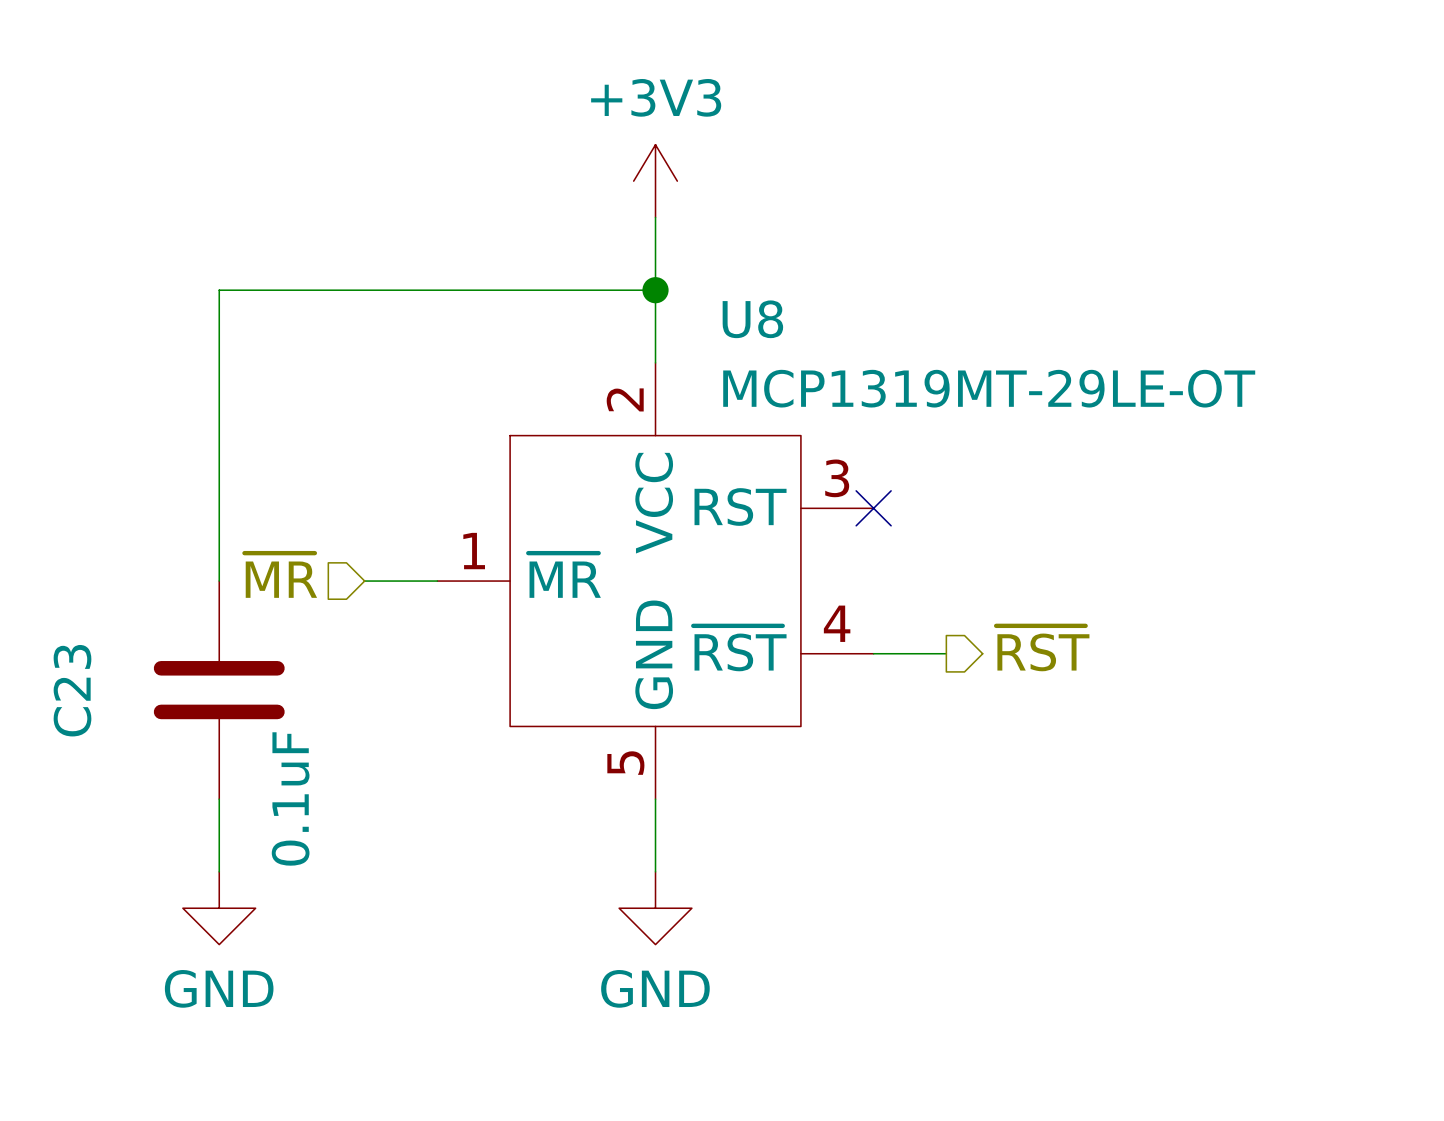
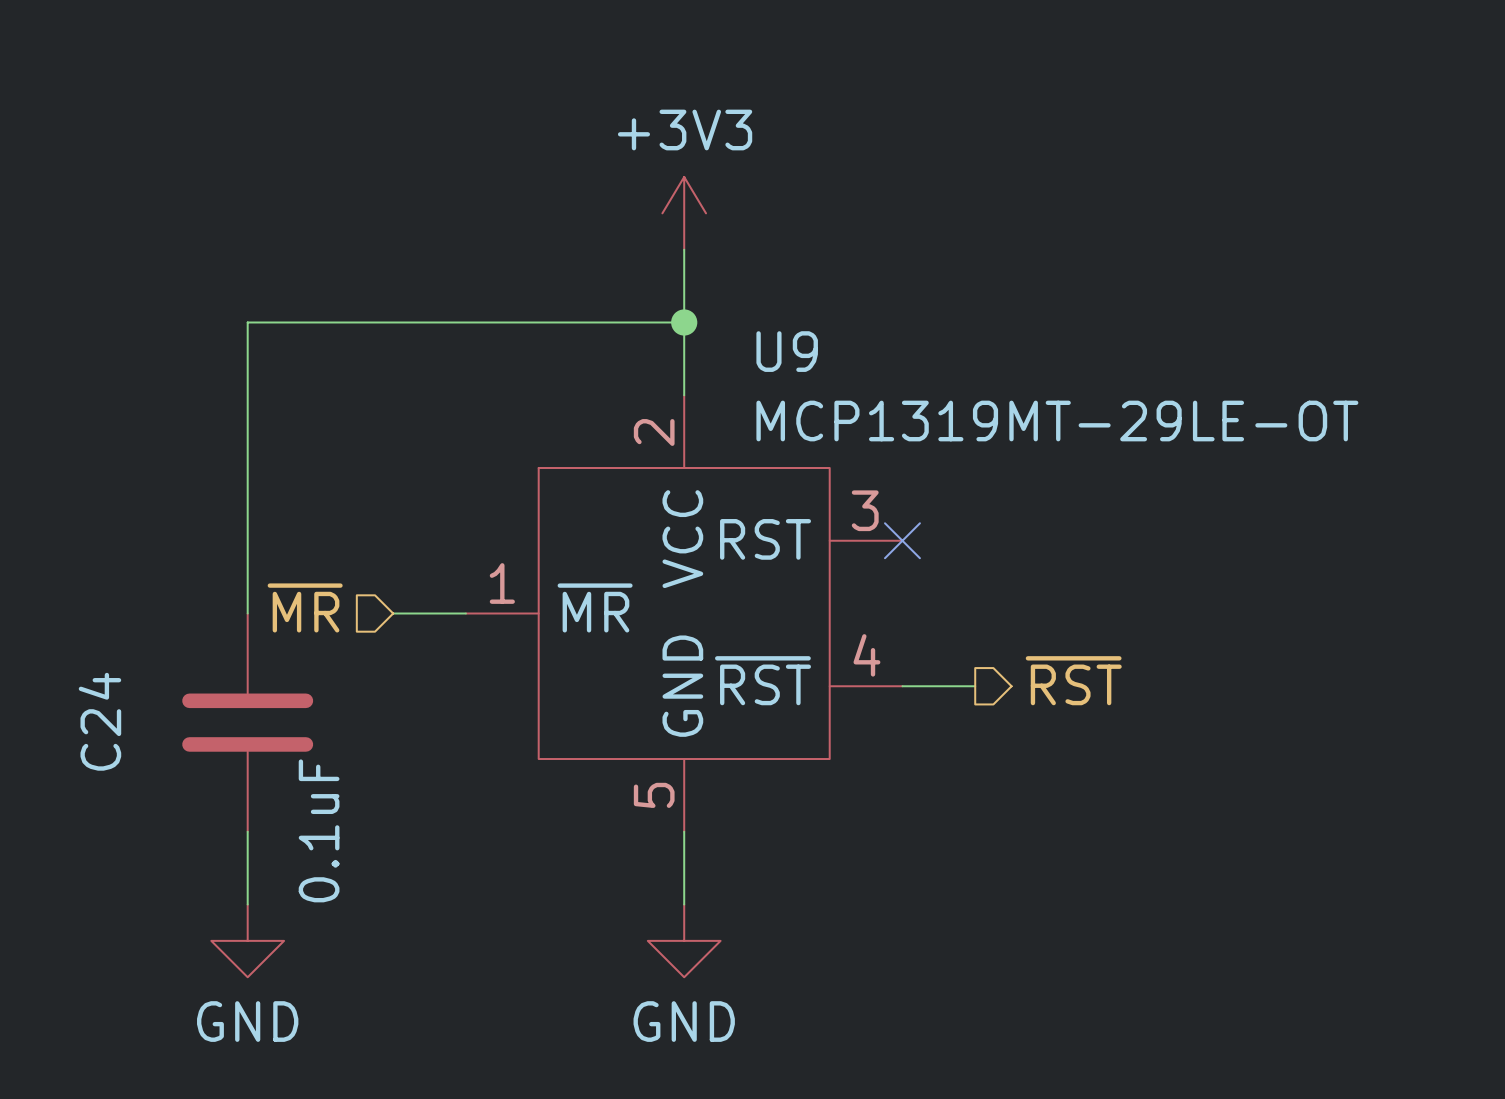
U8 name: U8 (752, 319) -> U9 (787, 351)
C23 name: C23 (72, 690) -> C24 (99, 721)

